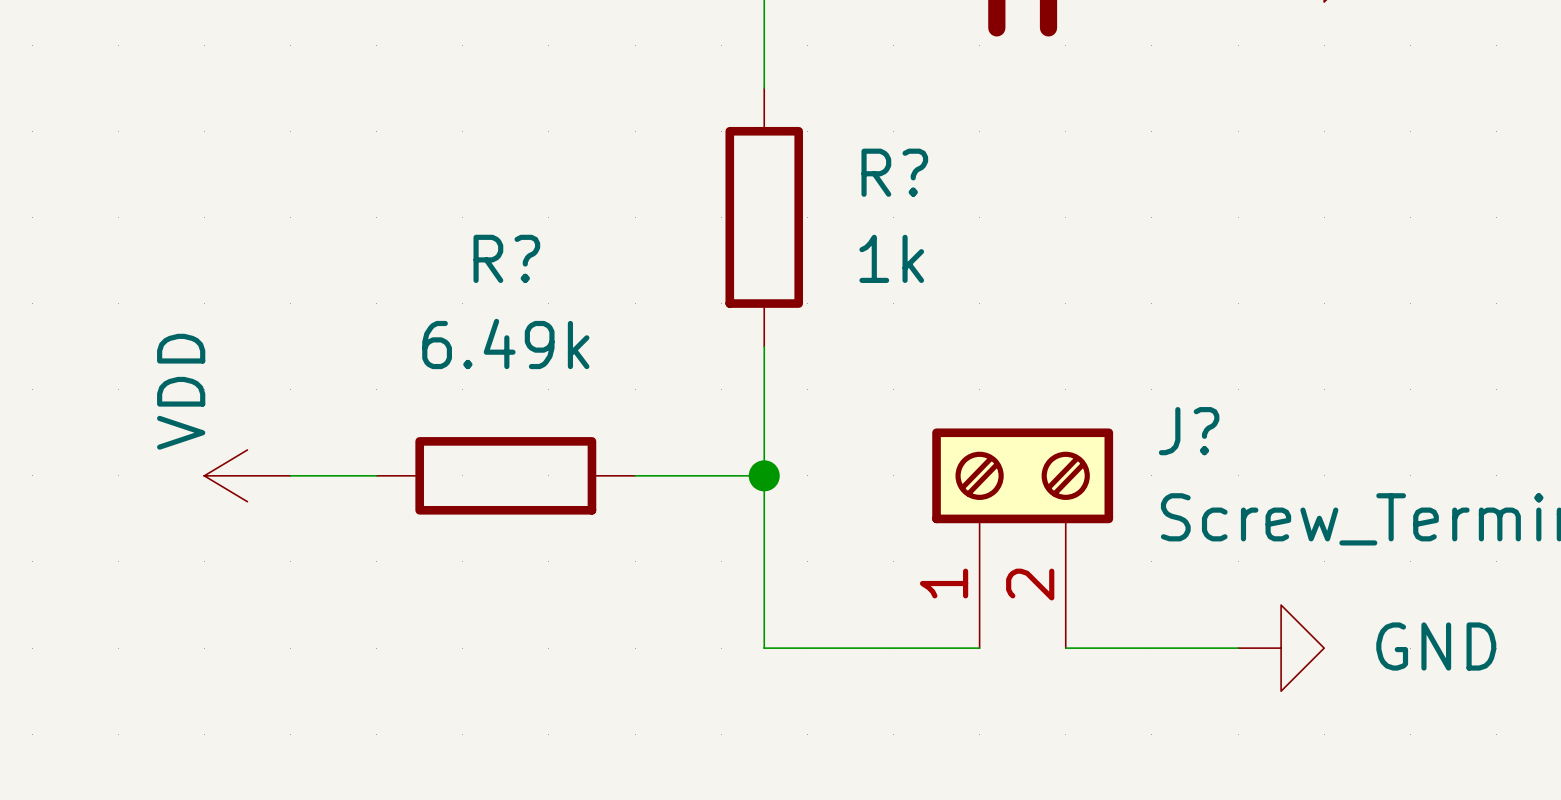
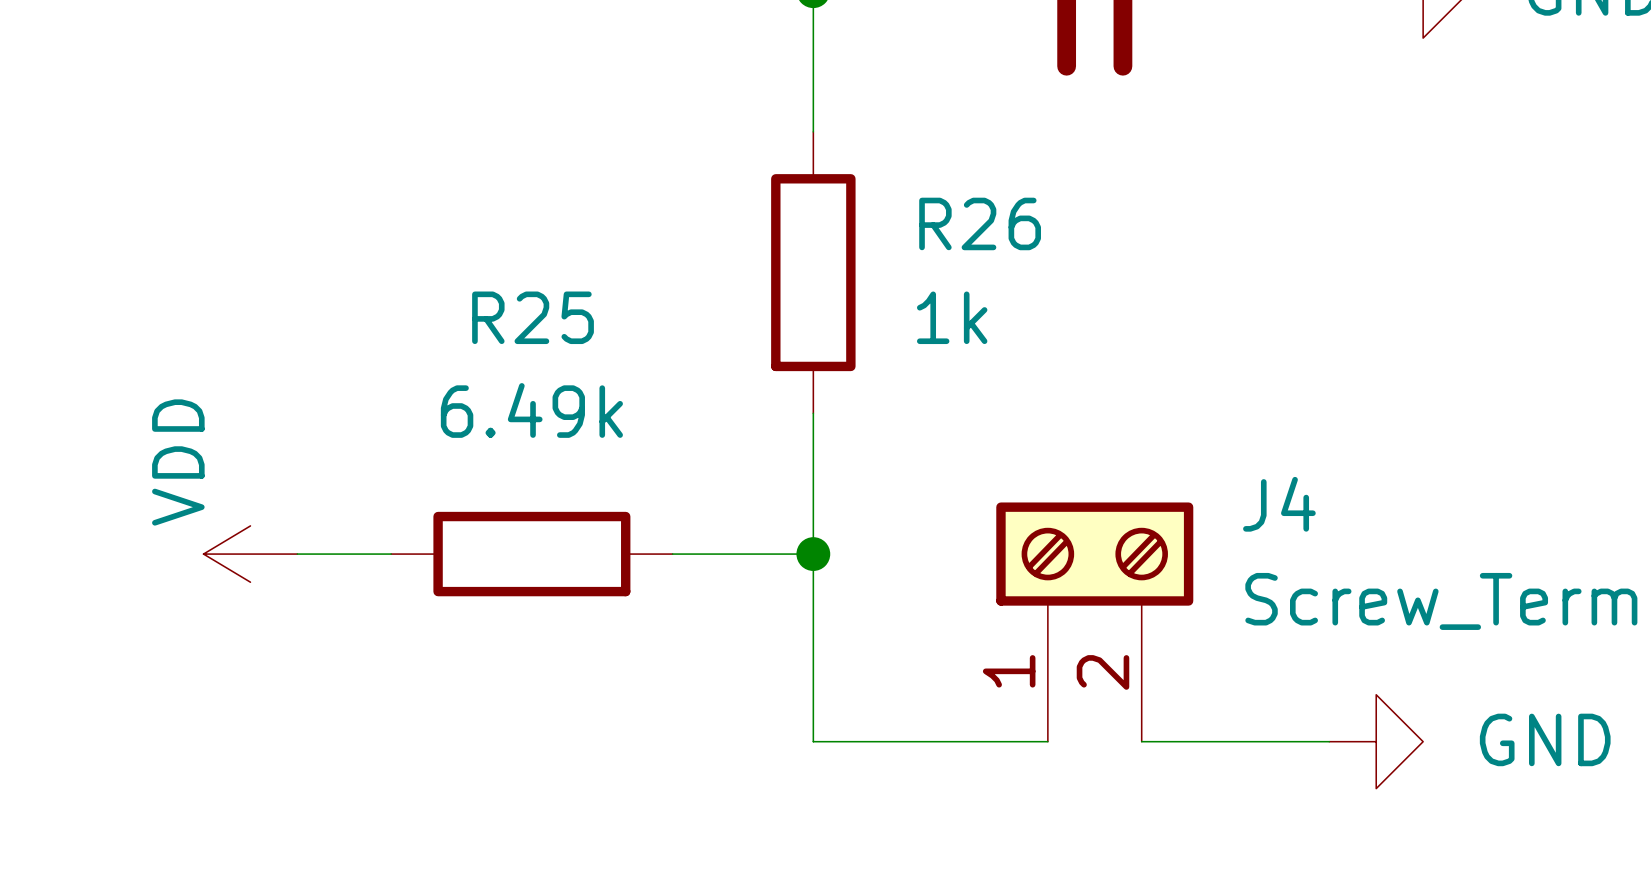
R? name: R? (894, 172) -> R26 (980, 223)
R? name: R? (506, 258) -> R25 (533, 317)
J? name: J? (1189, 431) -> J4 (1279, 504)

